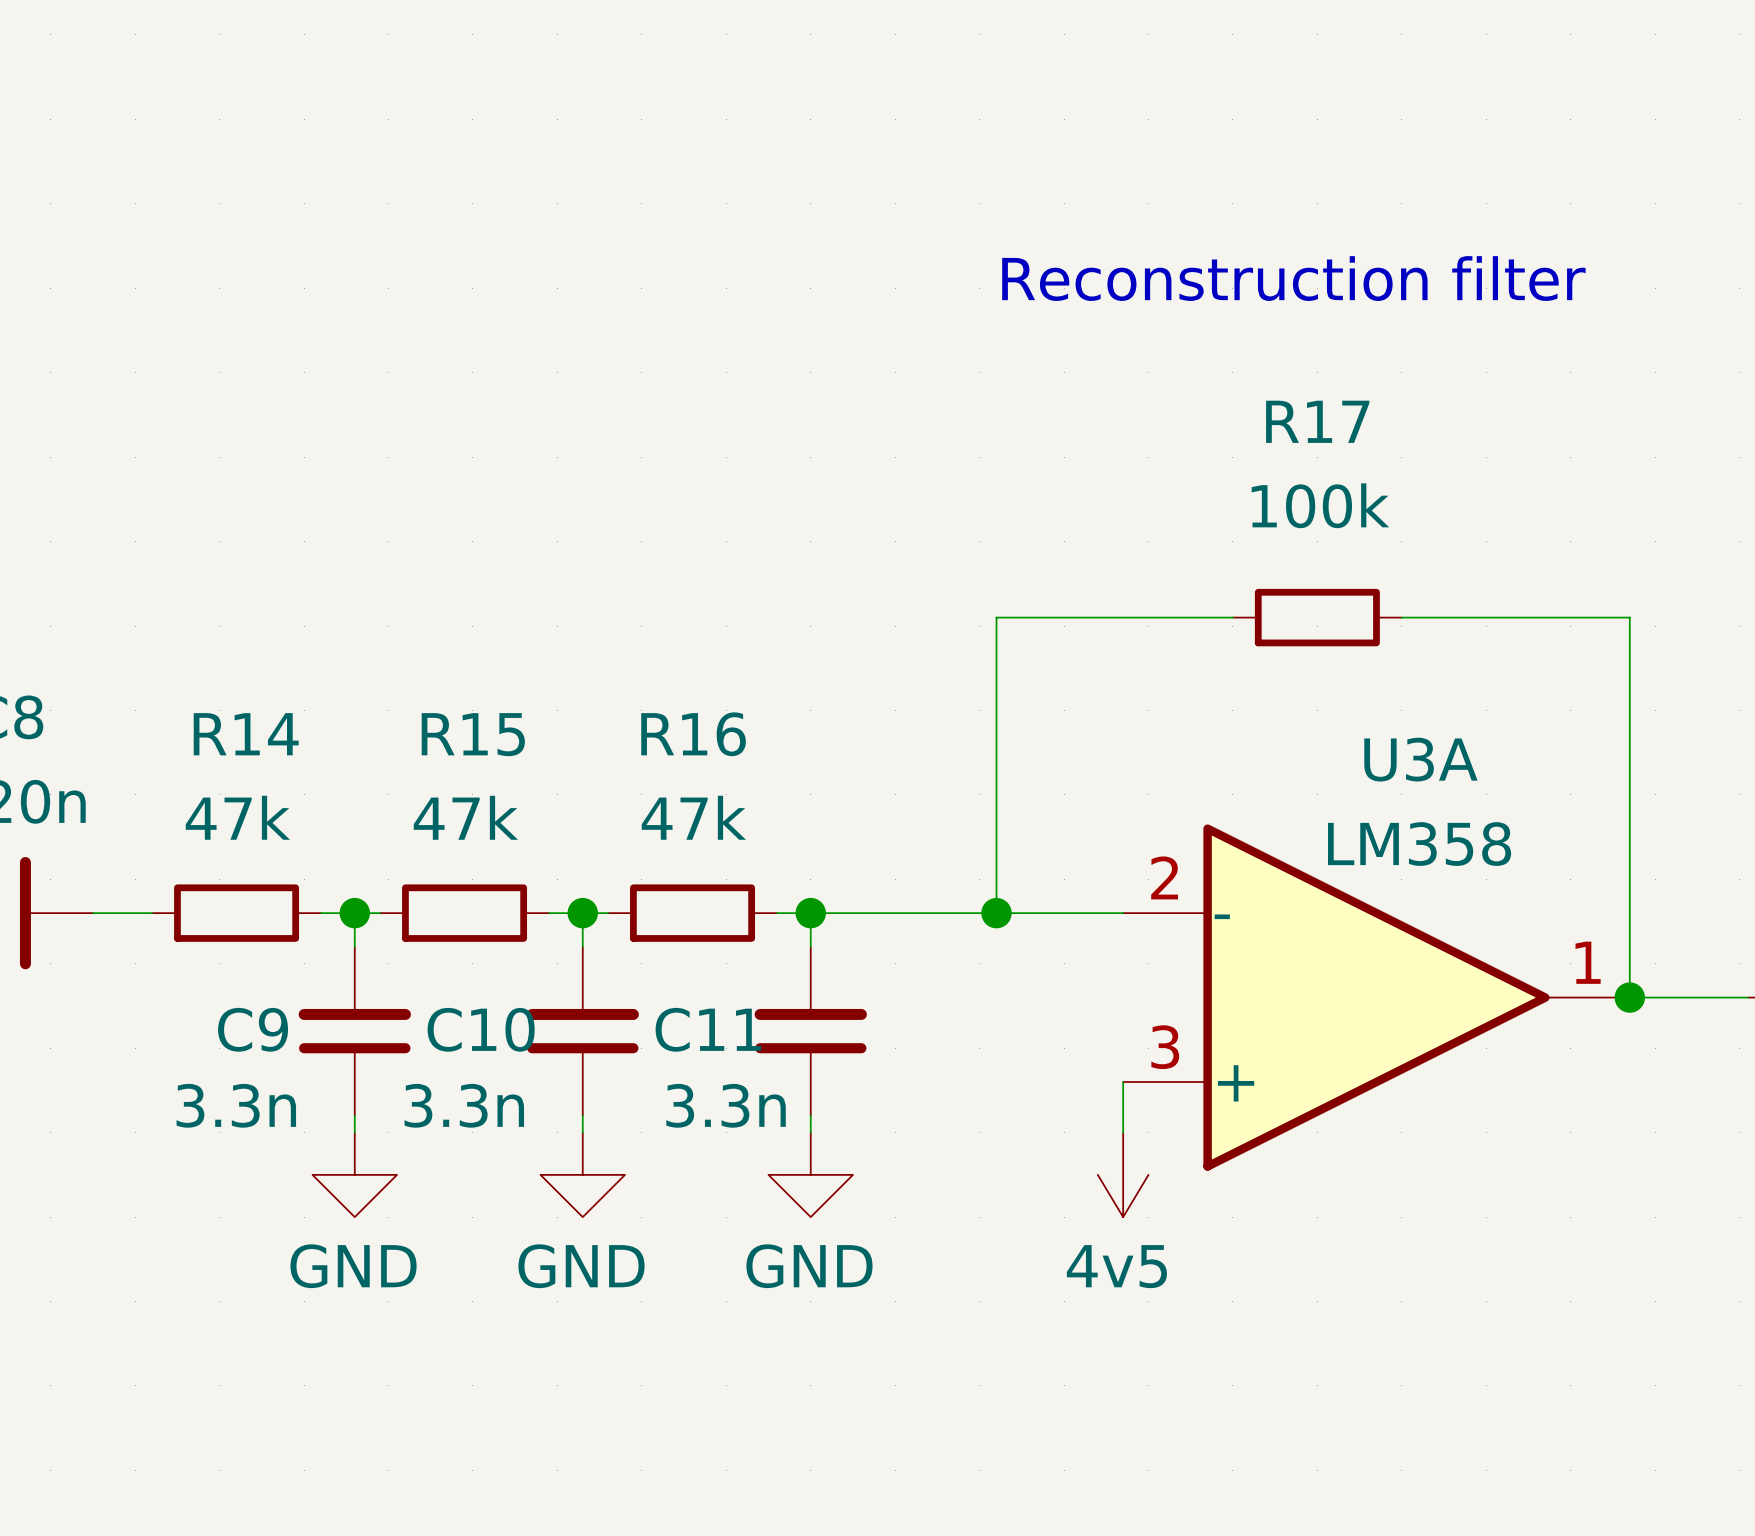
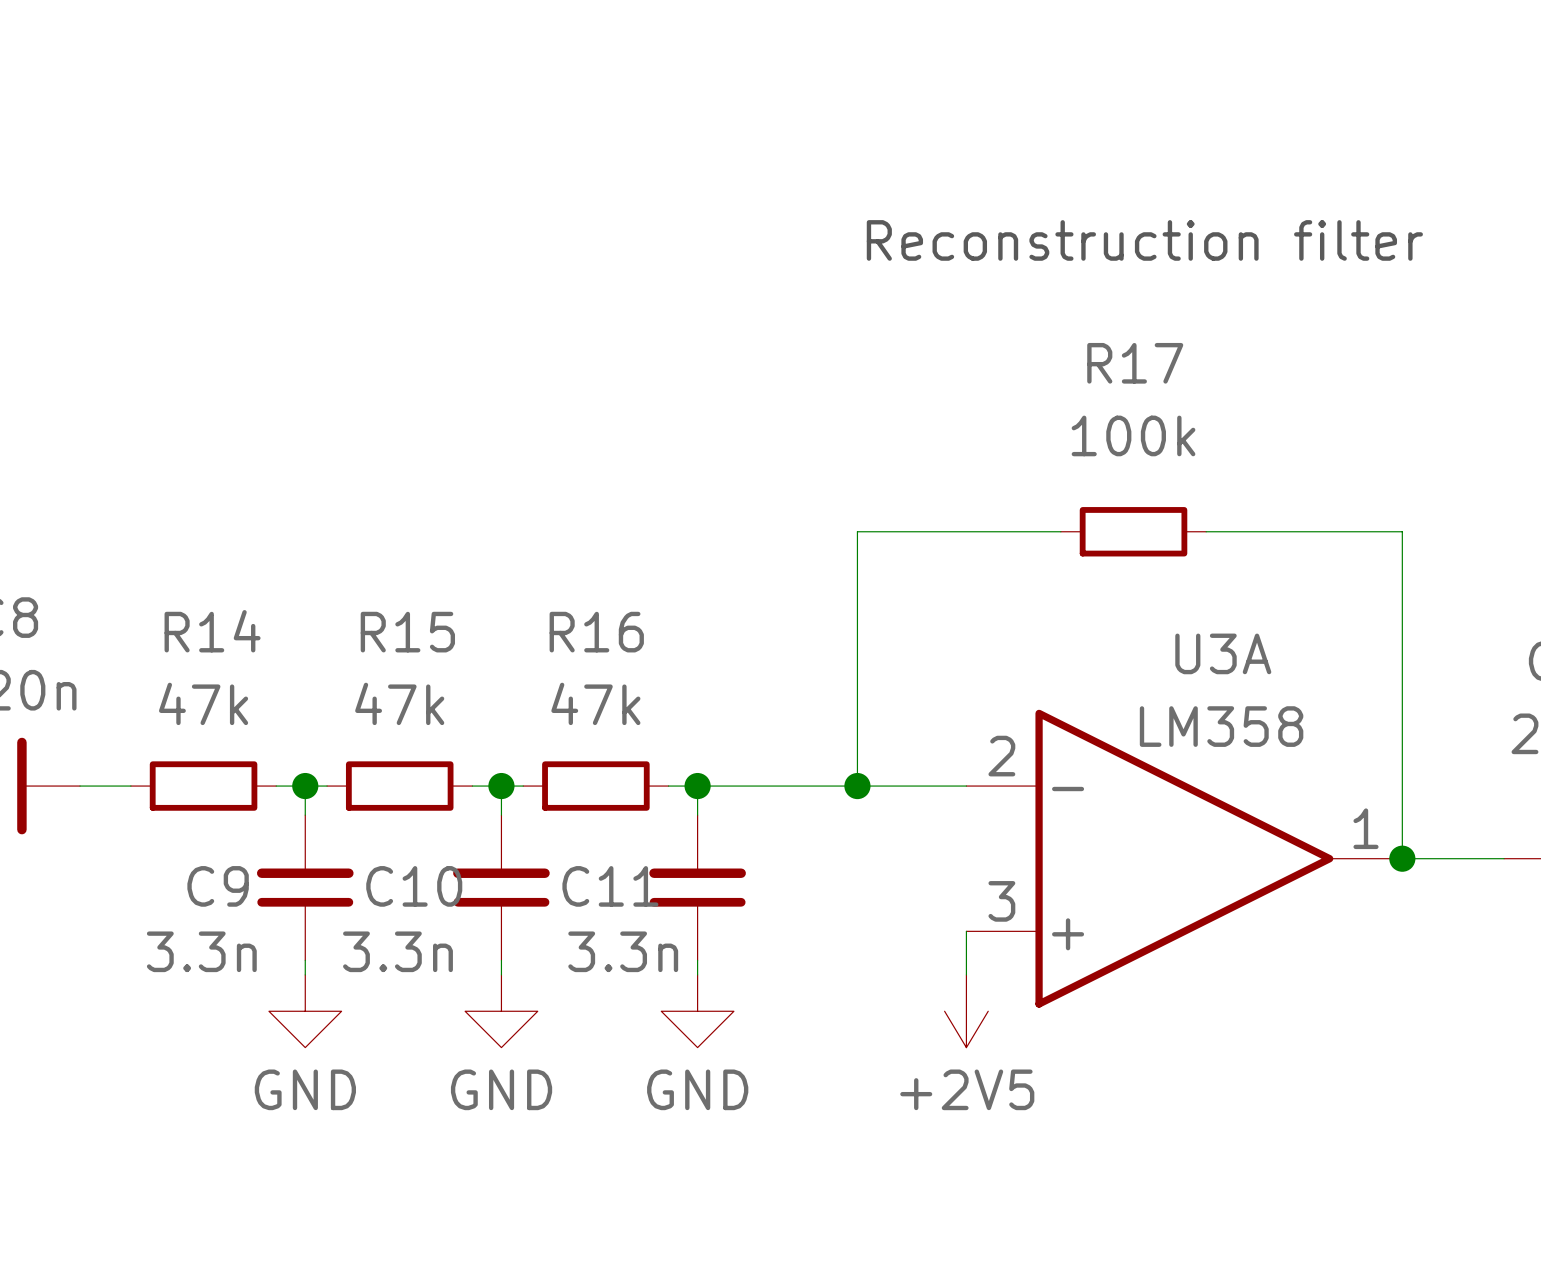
part: 4v5 (1123, 1174) -> none
power symbol: none -> +2V5 (966, 1011)

